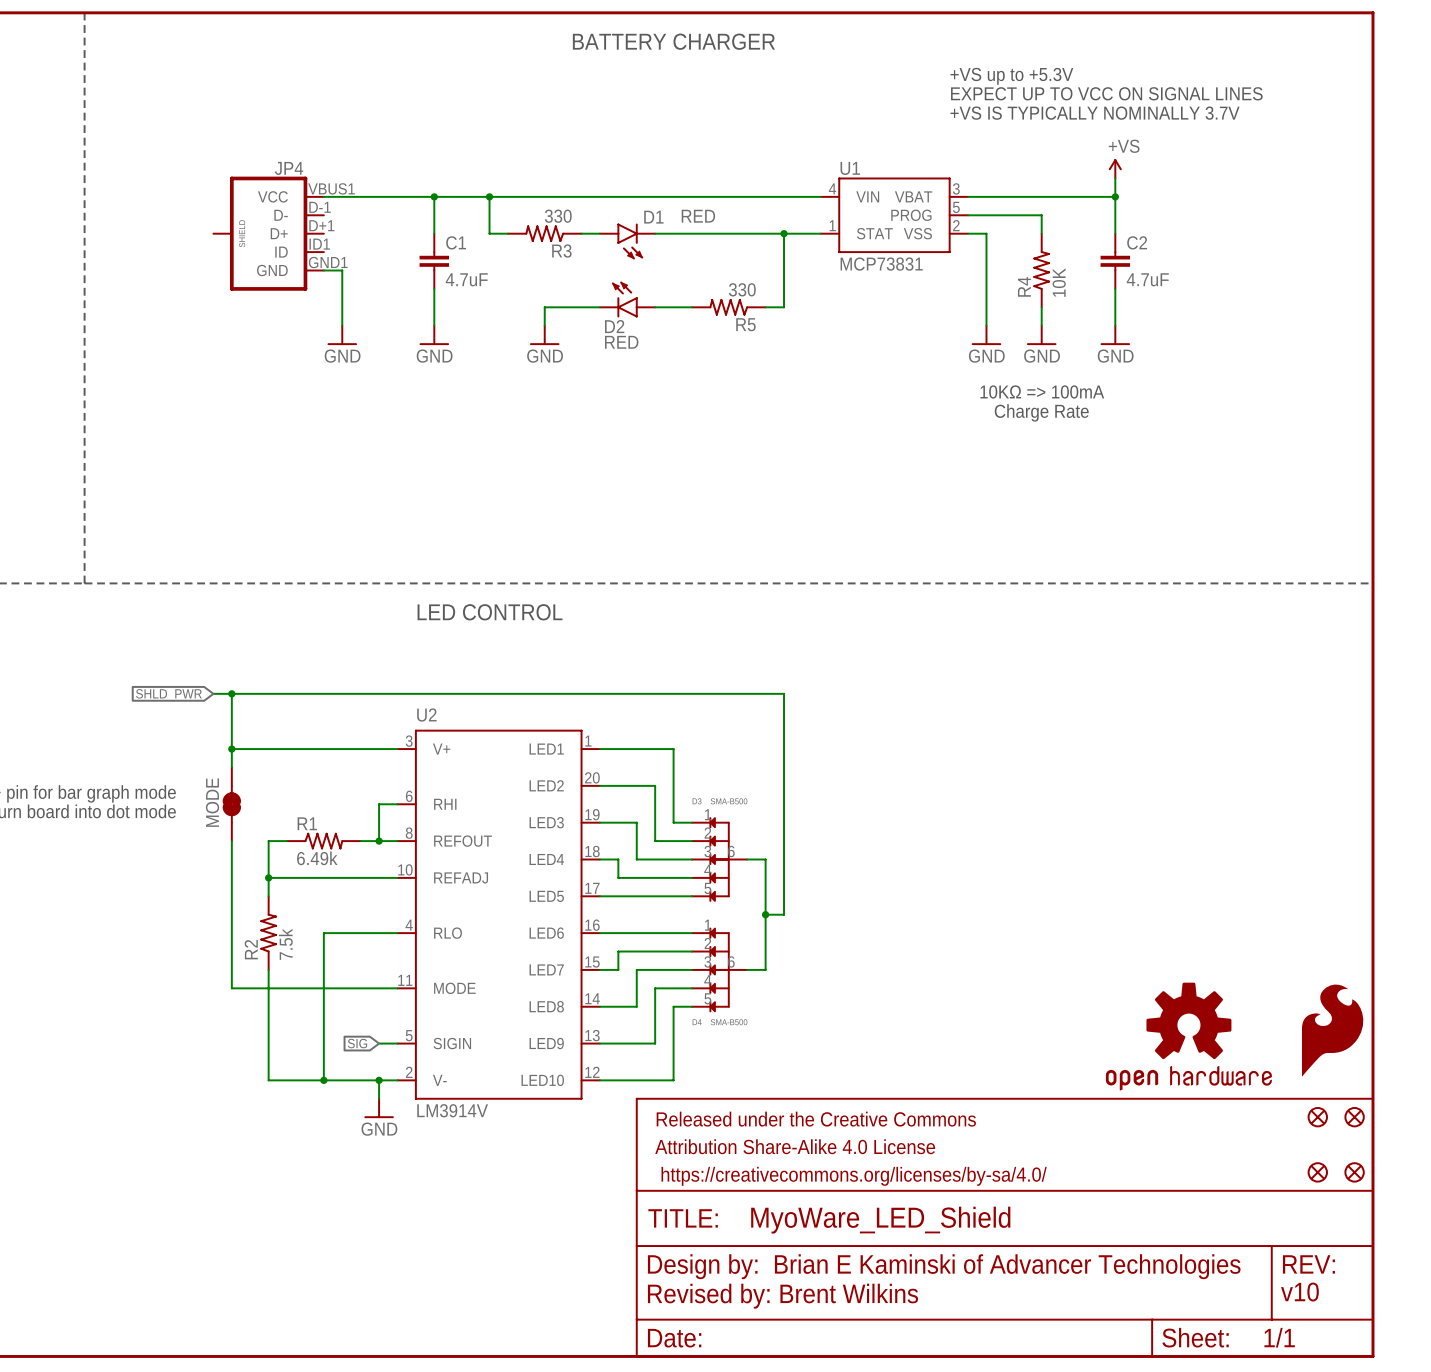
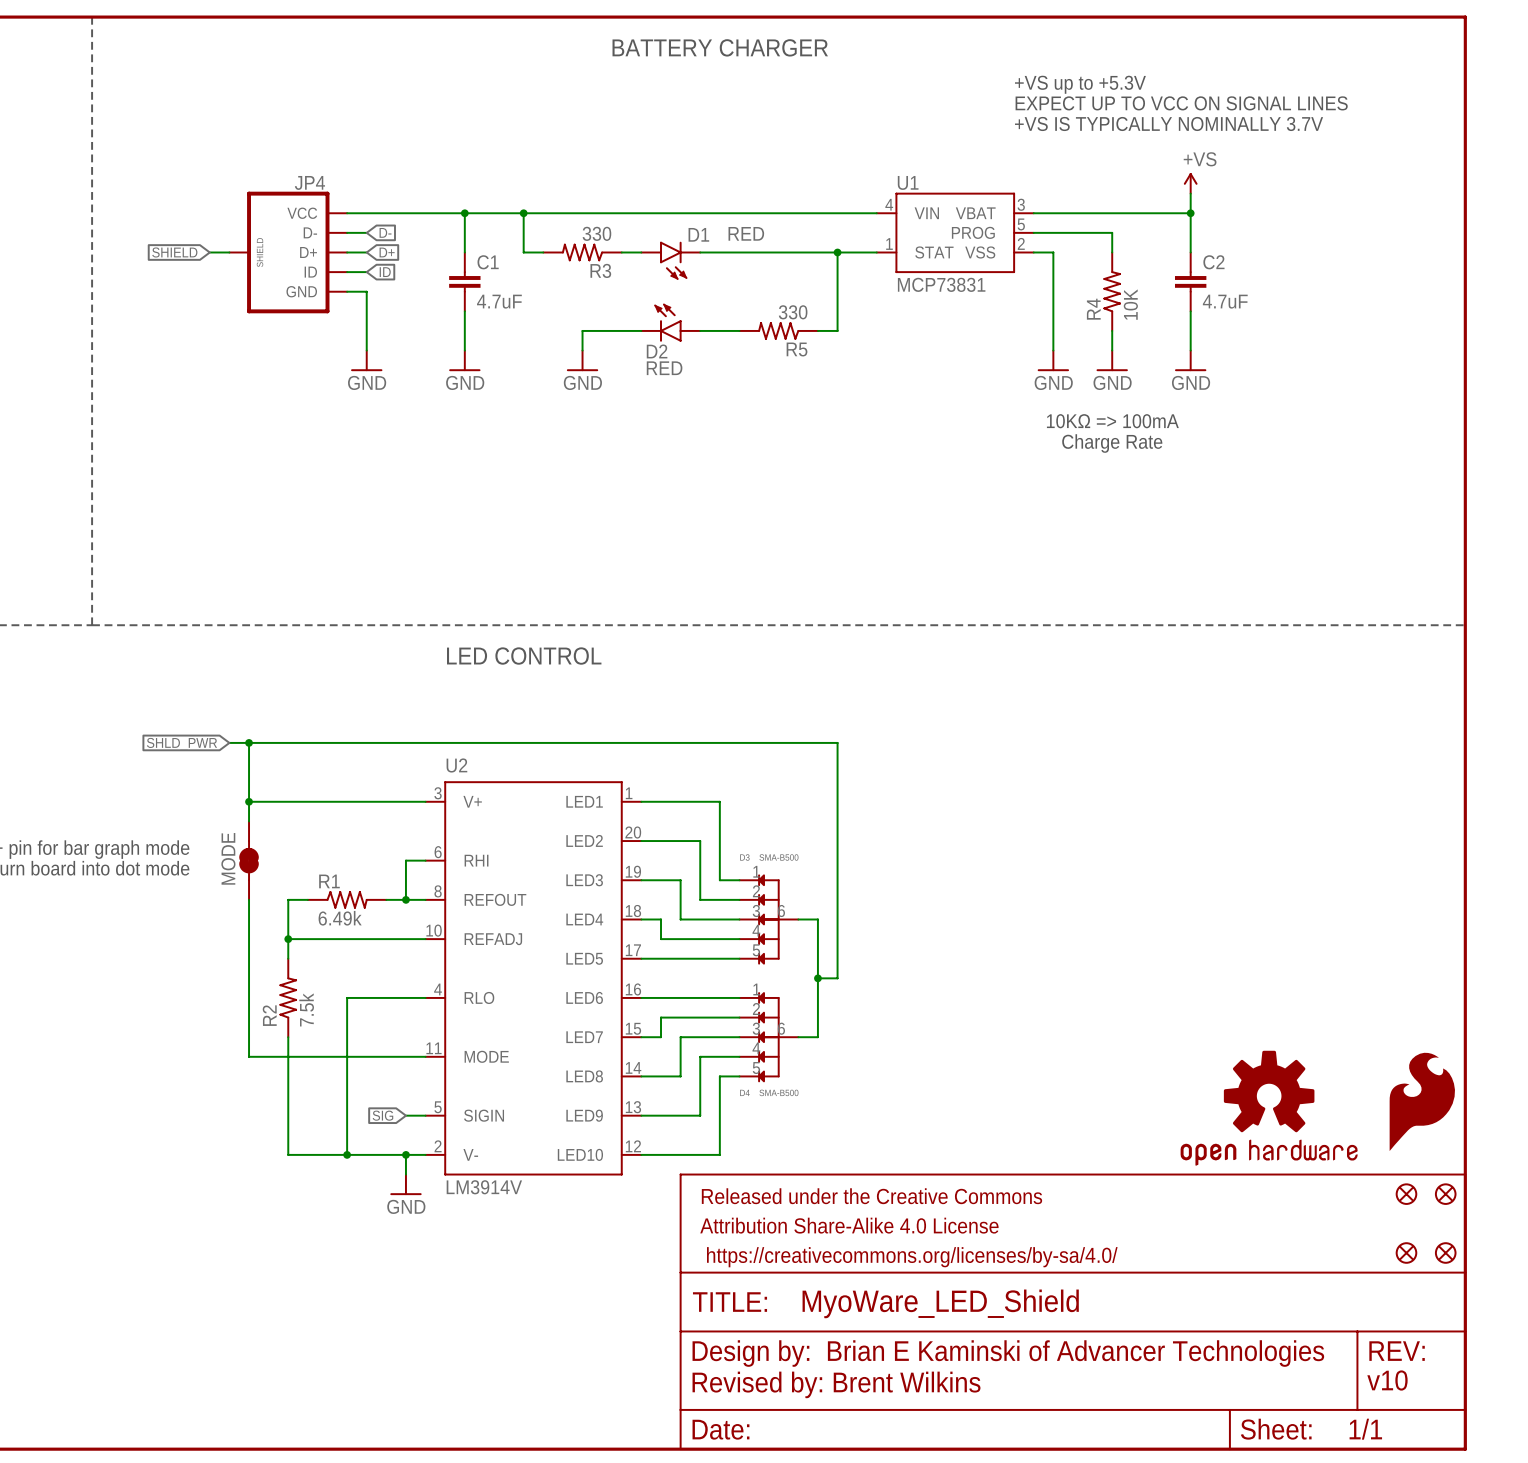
JP4 symbol: [213, 176, 324, 291] -> [229, 191, 348, 314]
wire: none -> (347, 232) (366, 232)
global label: none -> D- (385, 232)
global label: none -> SHIELD (174, 252)
wire: none -> (209, 252) (229, 252)
wire: none -> (347, 252) (366, 252)
global label: none -> D+ (387, 252)
wire: none -> (347, 272) (366, 272)
global label: none -> ID (385, 272)

